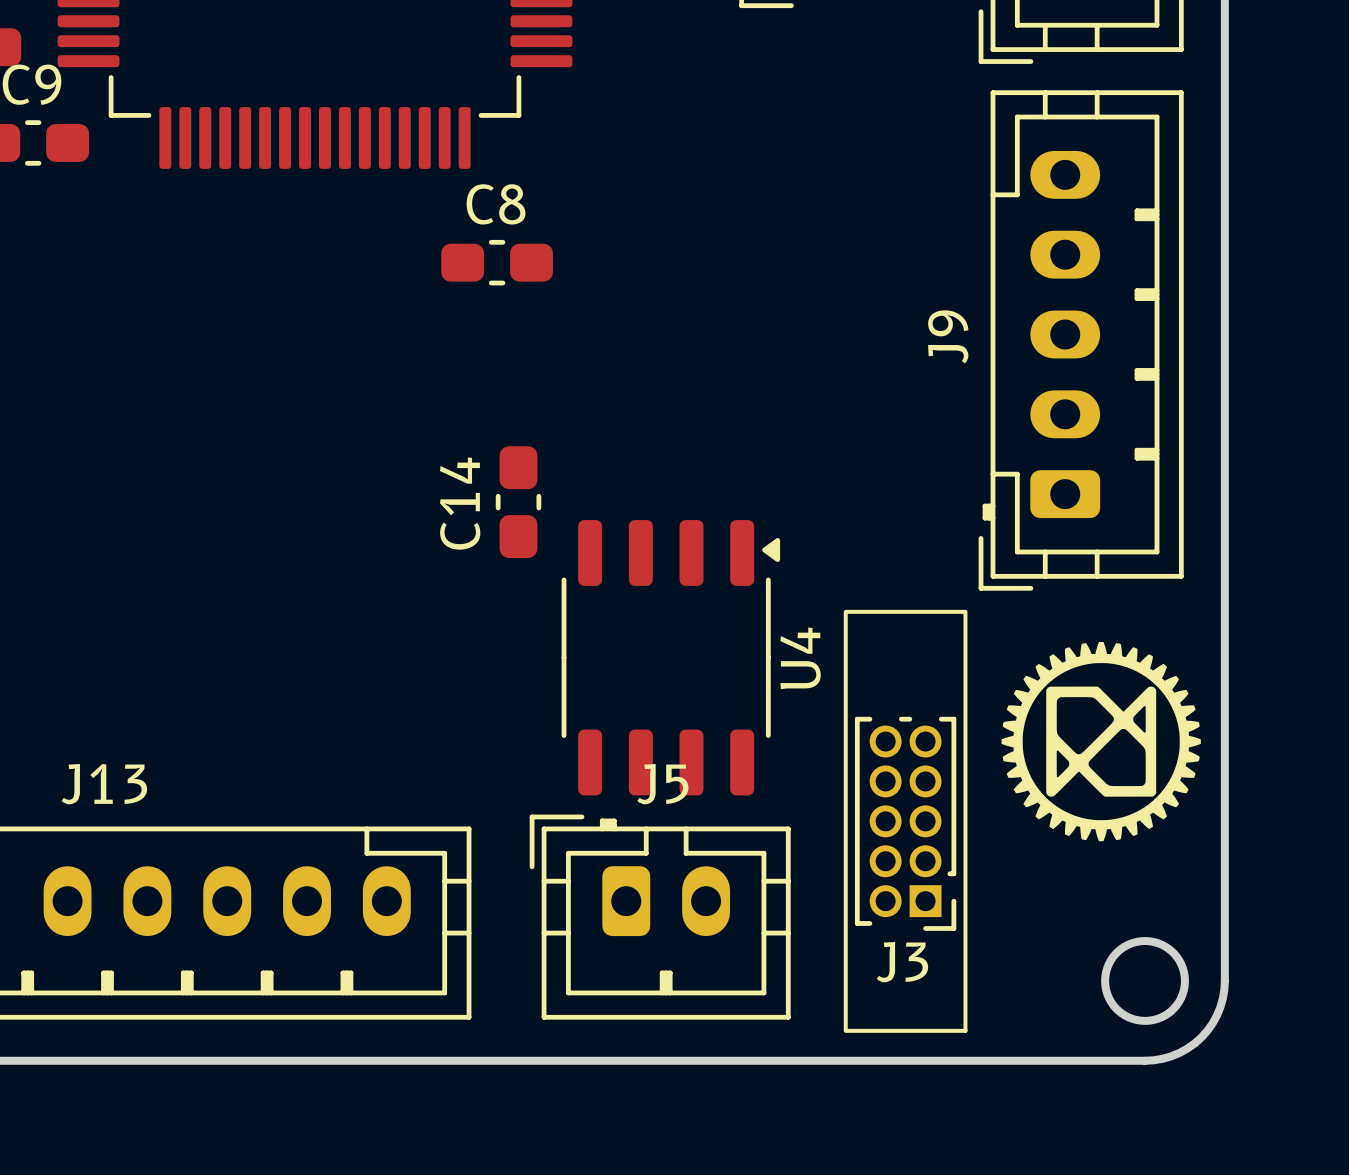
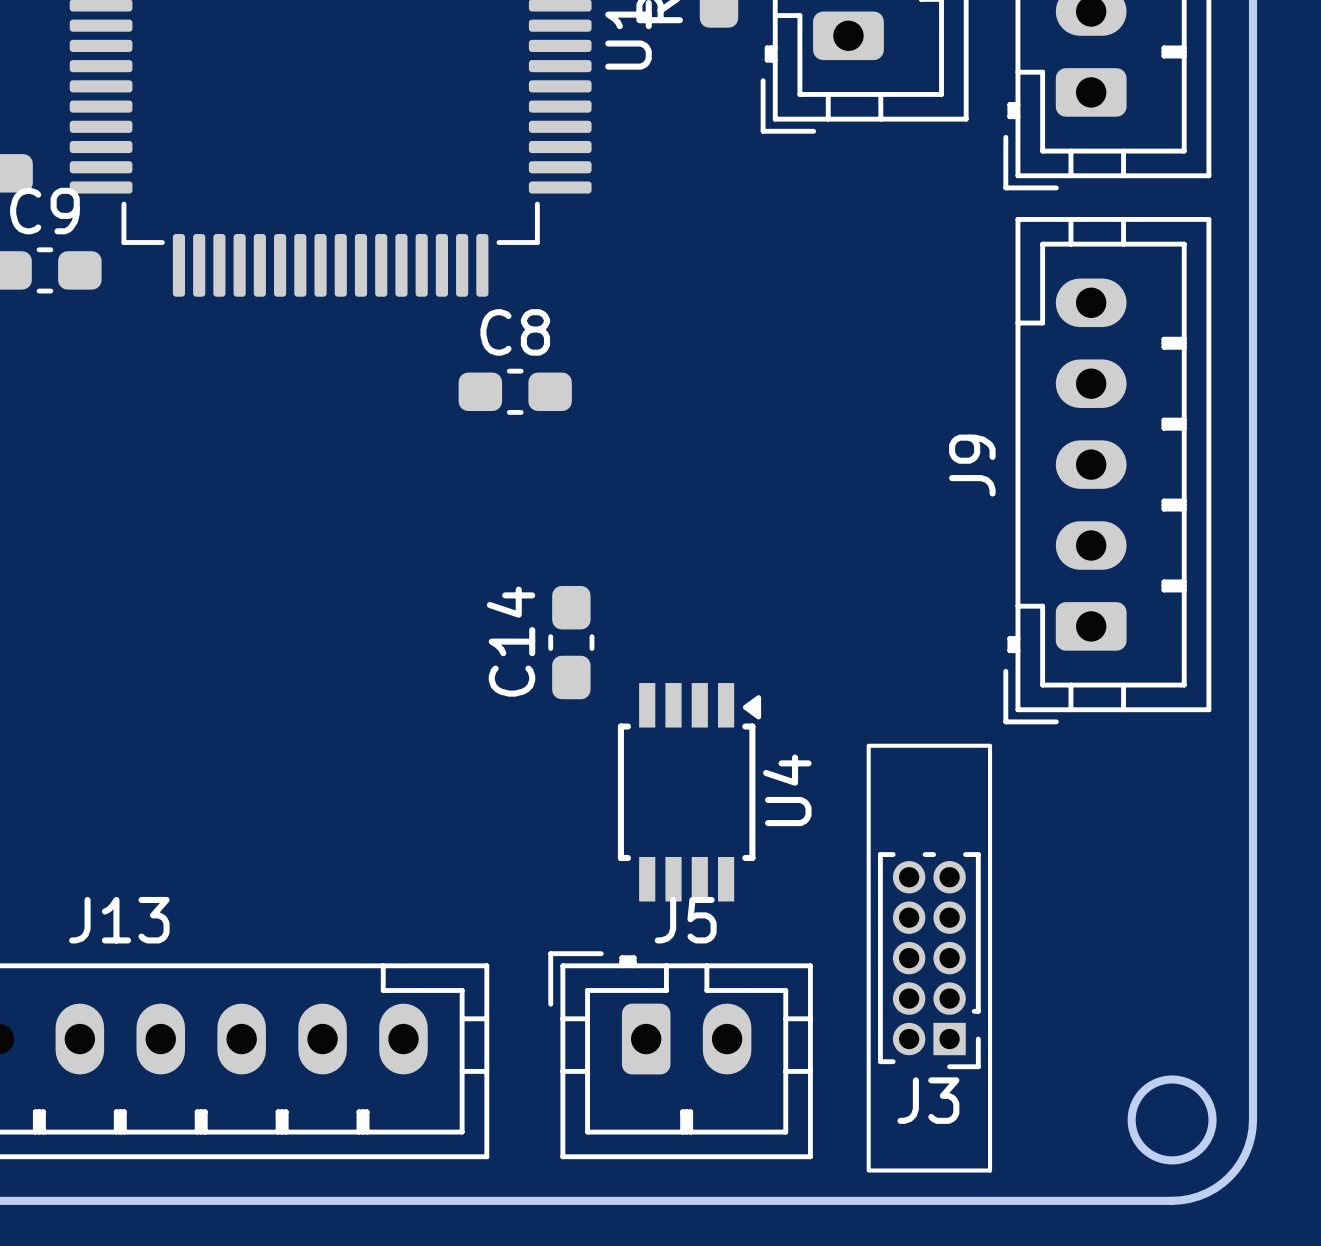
C14 position: (518, 502) -> (571, 642)
U4 footprint: [561, 520, 781, 796] -> [617, 683, 762, 902]
drawing: [1001, 642, 1201, 842] -> none

